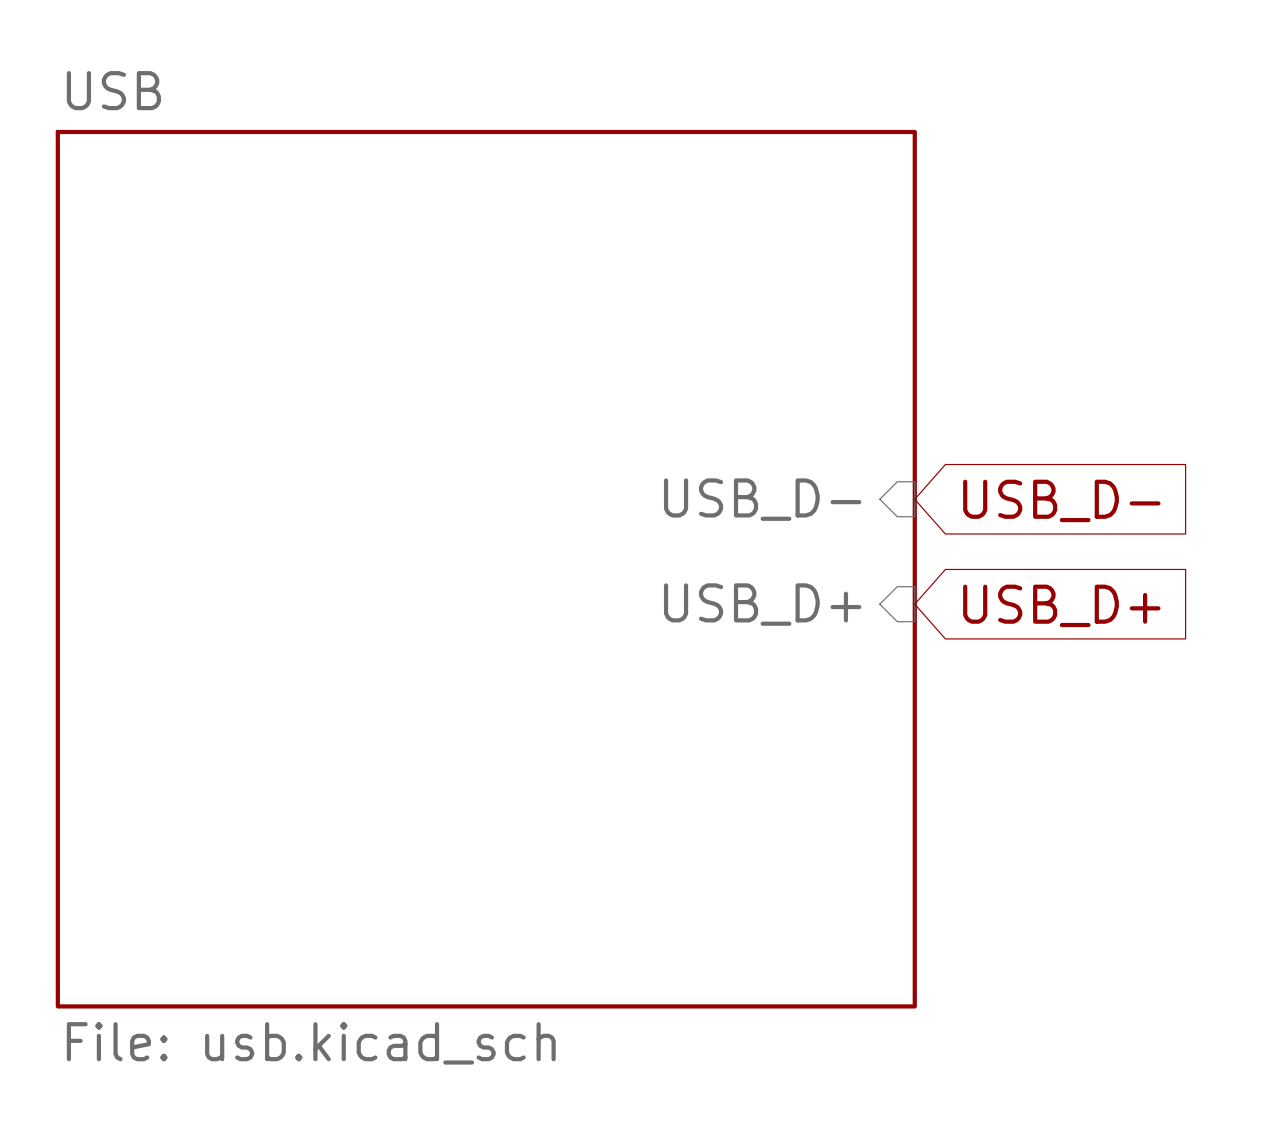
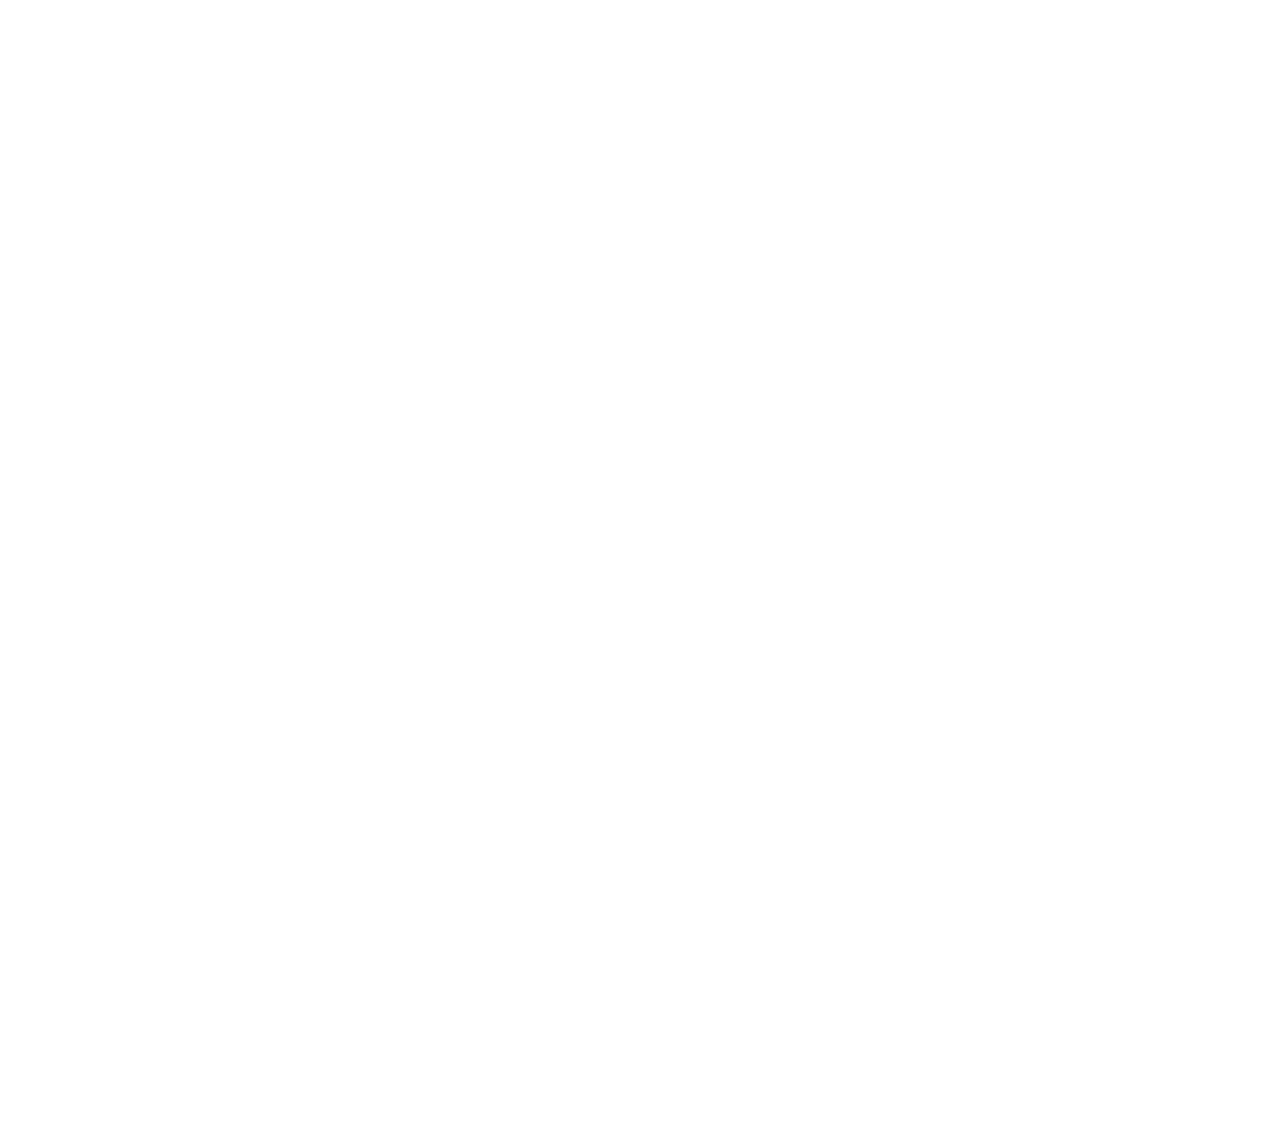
sheet pin: USB_D- (762, 499) -> none
global label: USB_D- (1061, 500) -> none
sheet USB: File: usb.kicad_sch (486, 569) -> none
sheet pin: USB_D+ (762, 604) -> none
global label: USB_D+ (1061, 605) -> none

